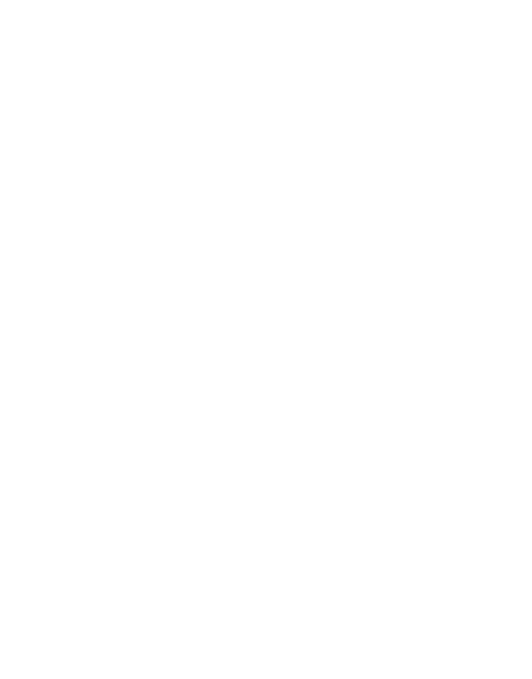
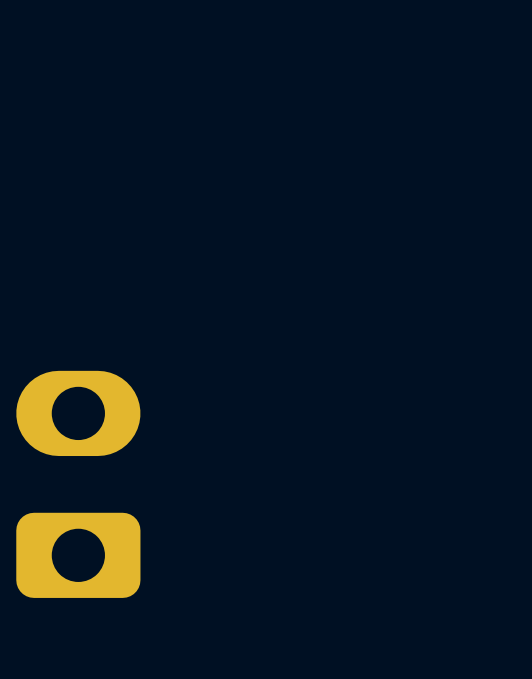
part: none -> (78, 484)

